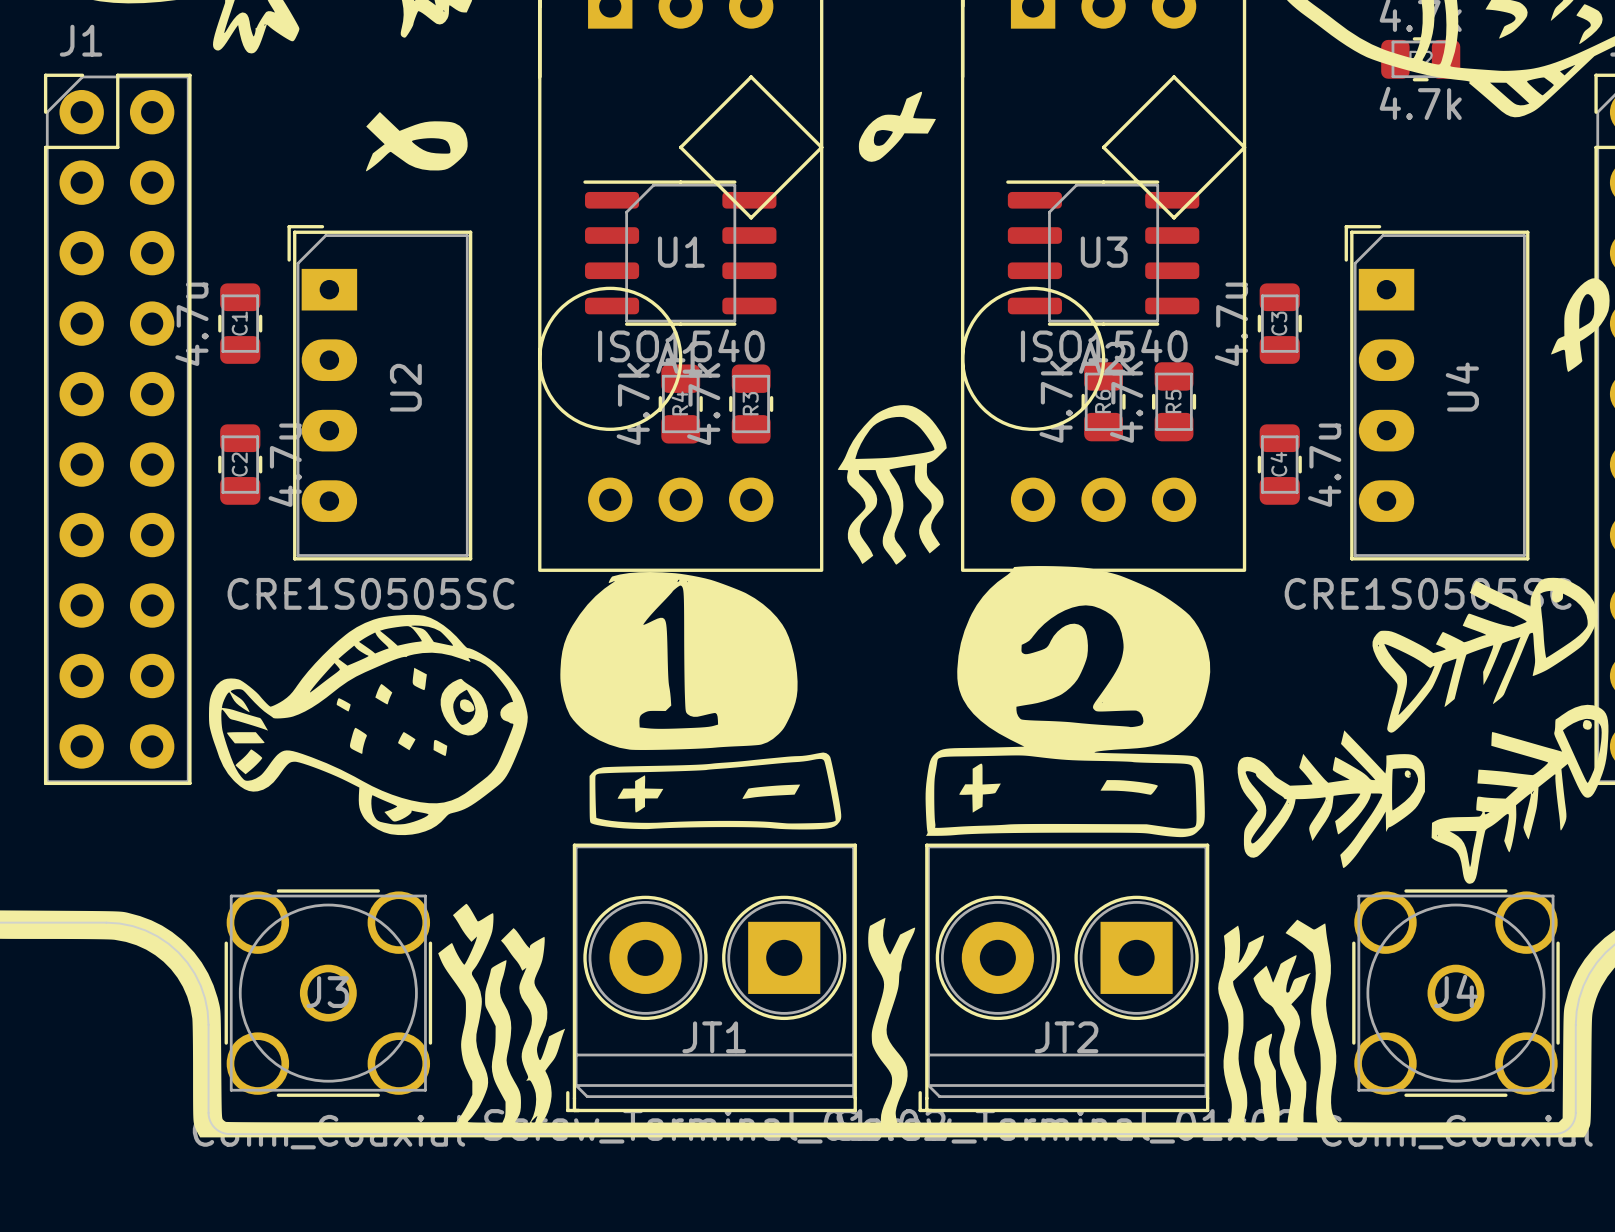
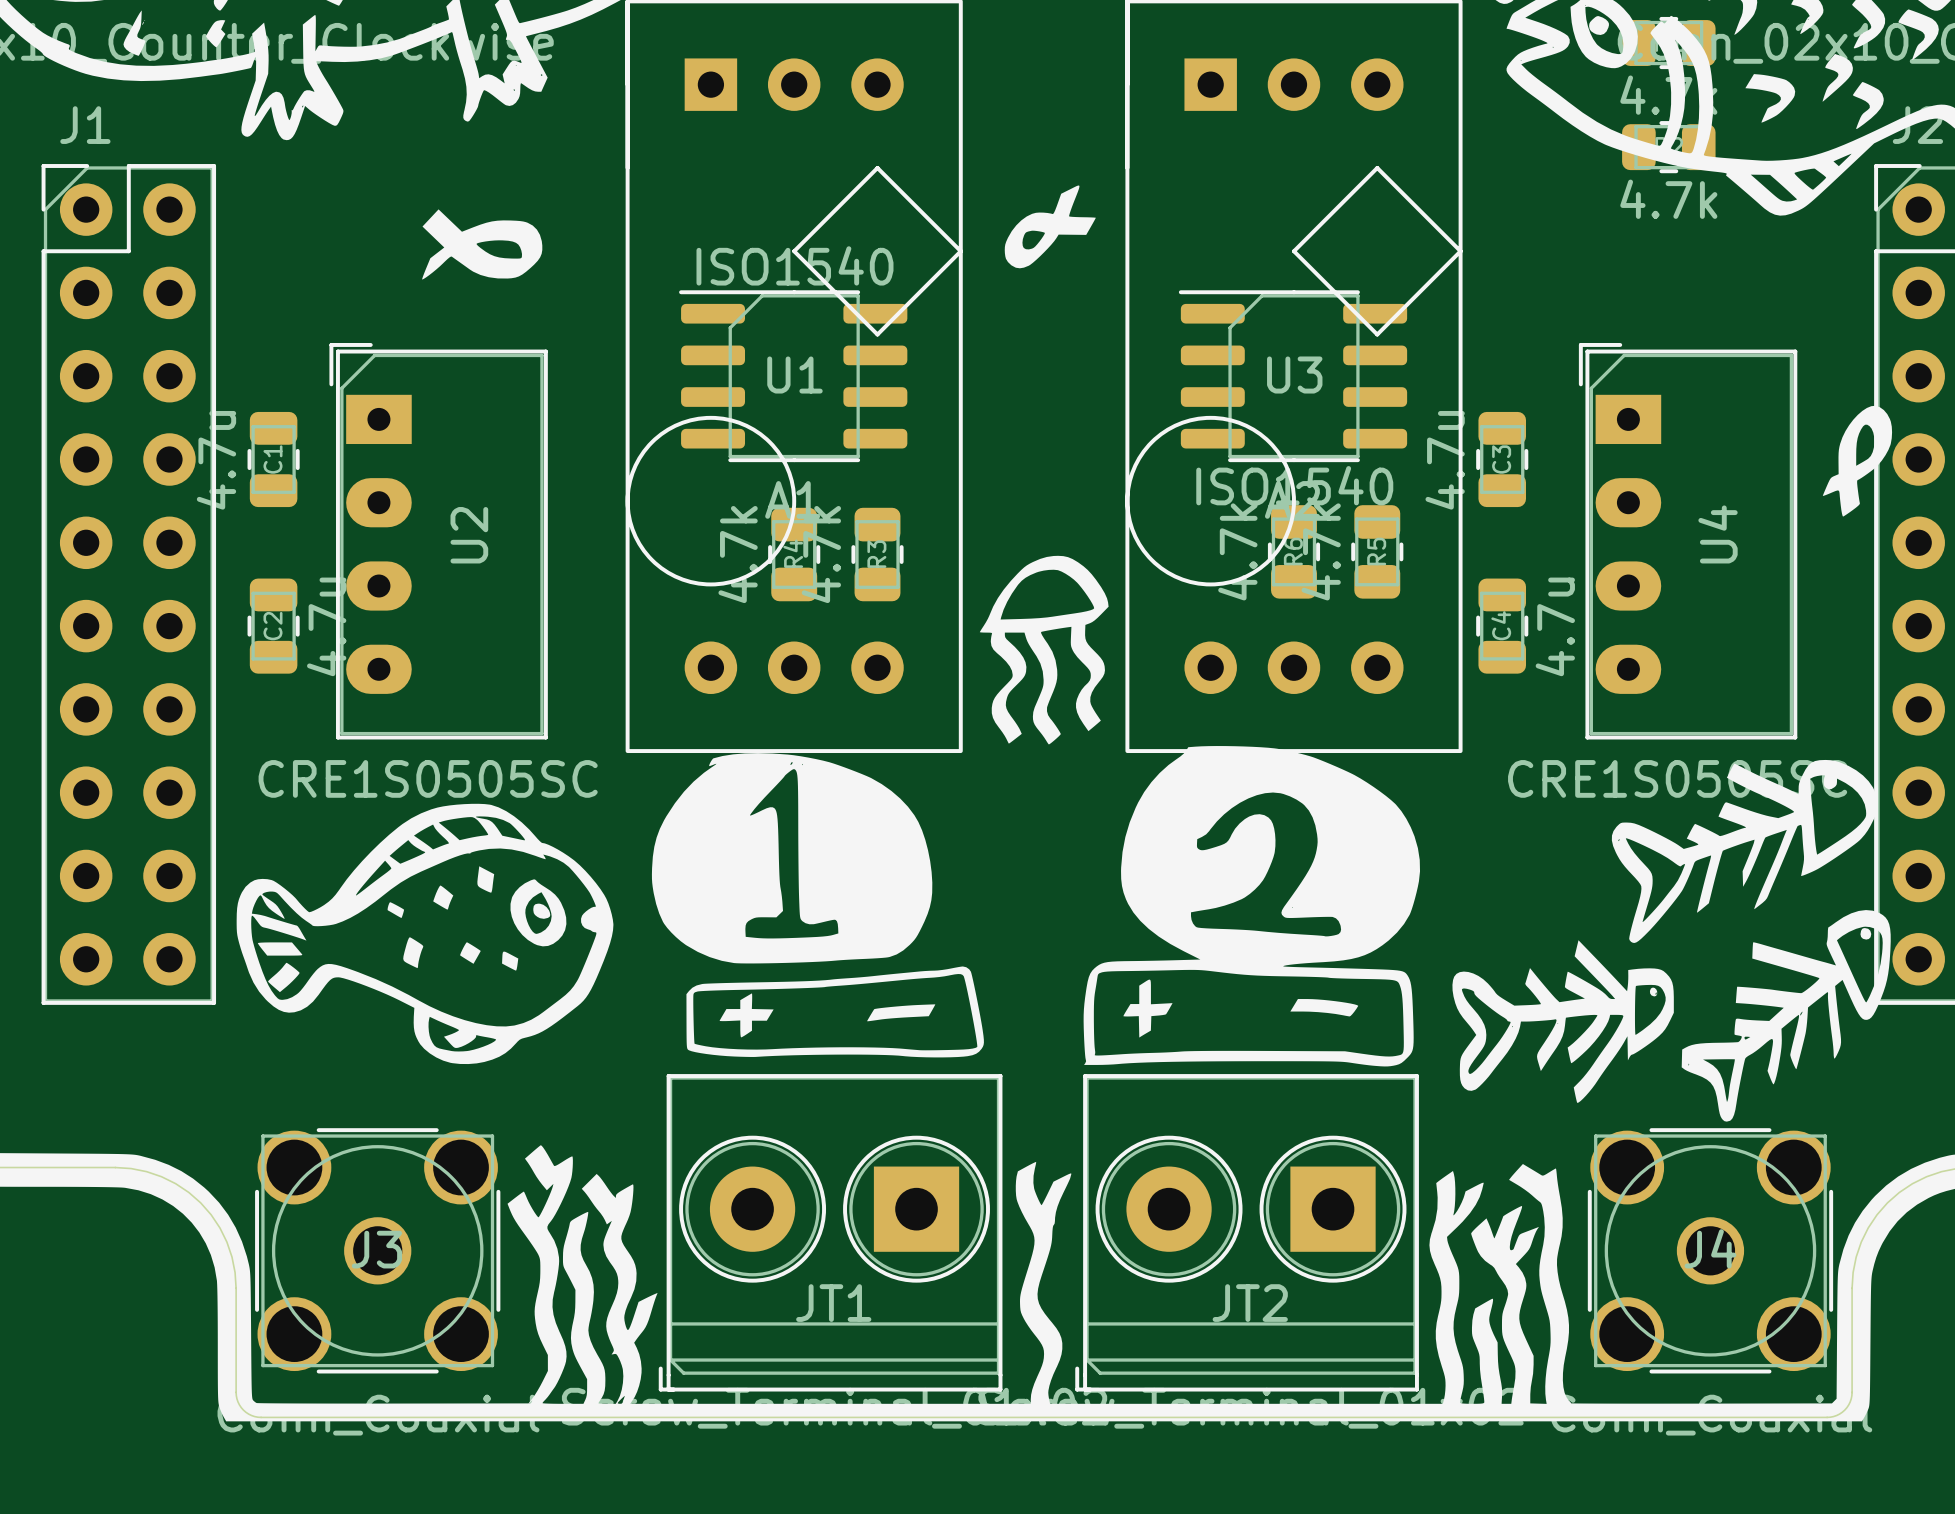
U1 value position: ISO1540 (681, 345) -> ISO1540 (794, 265)

